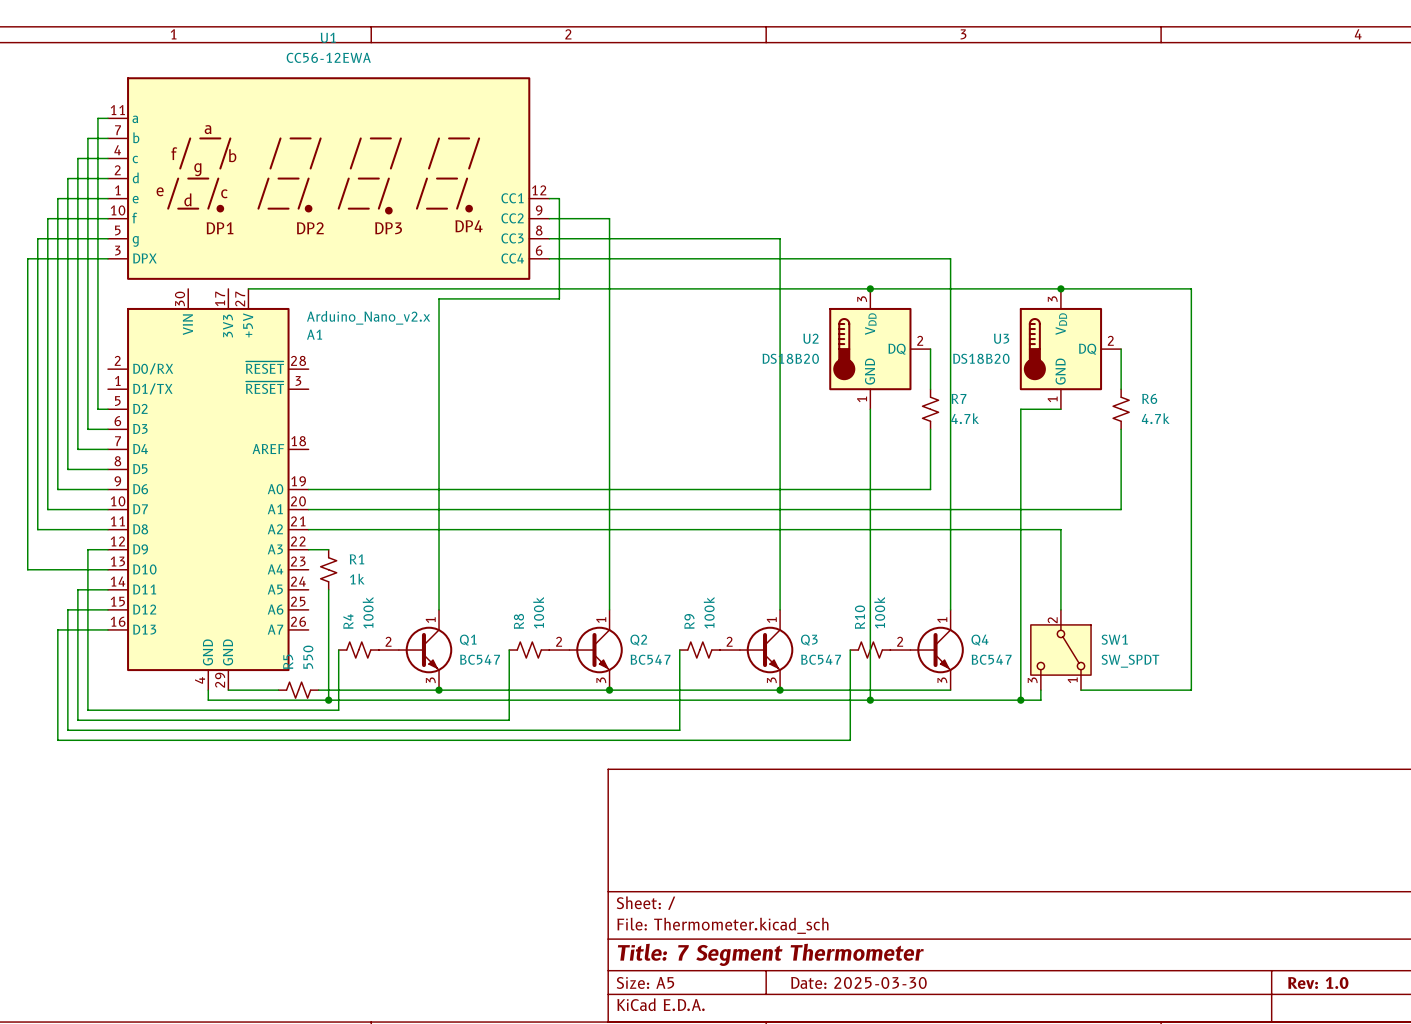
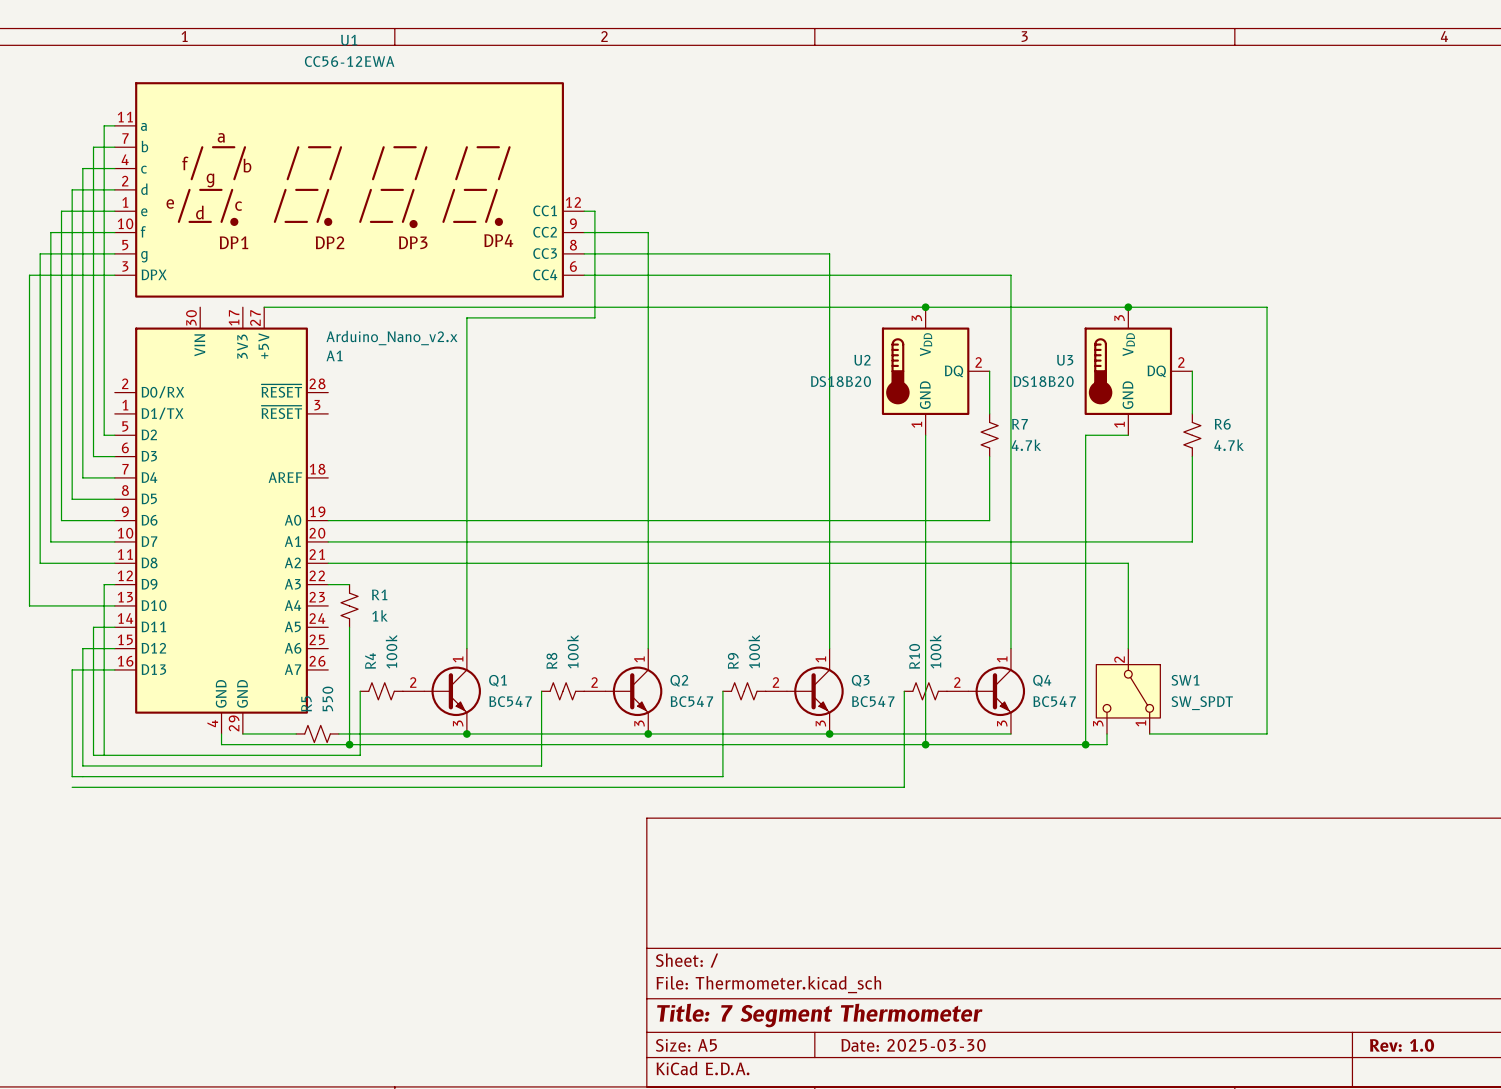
wire: (97, 549) (87, 549) (87, 589) (77, 589) (77, 609) (67, 609) (67, 629) (57, 629) (57, 740) (67, 740) -> (104, 584) (104, 755)

